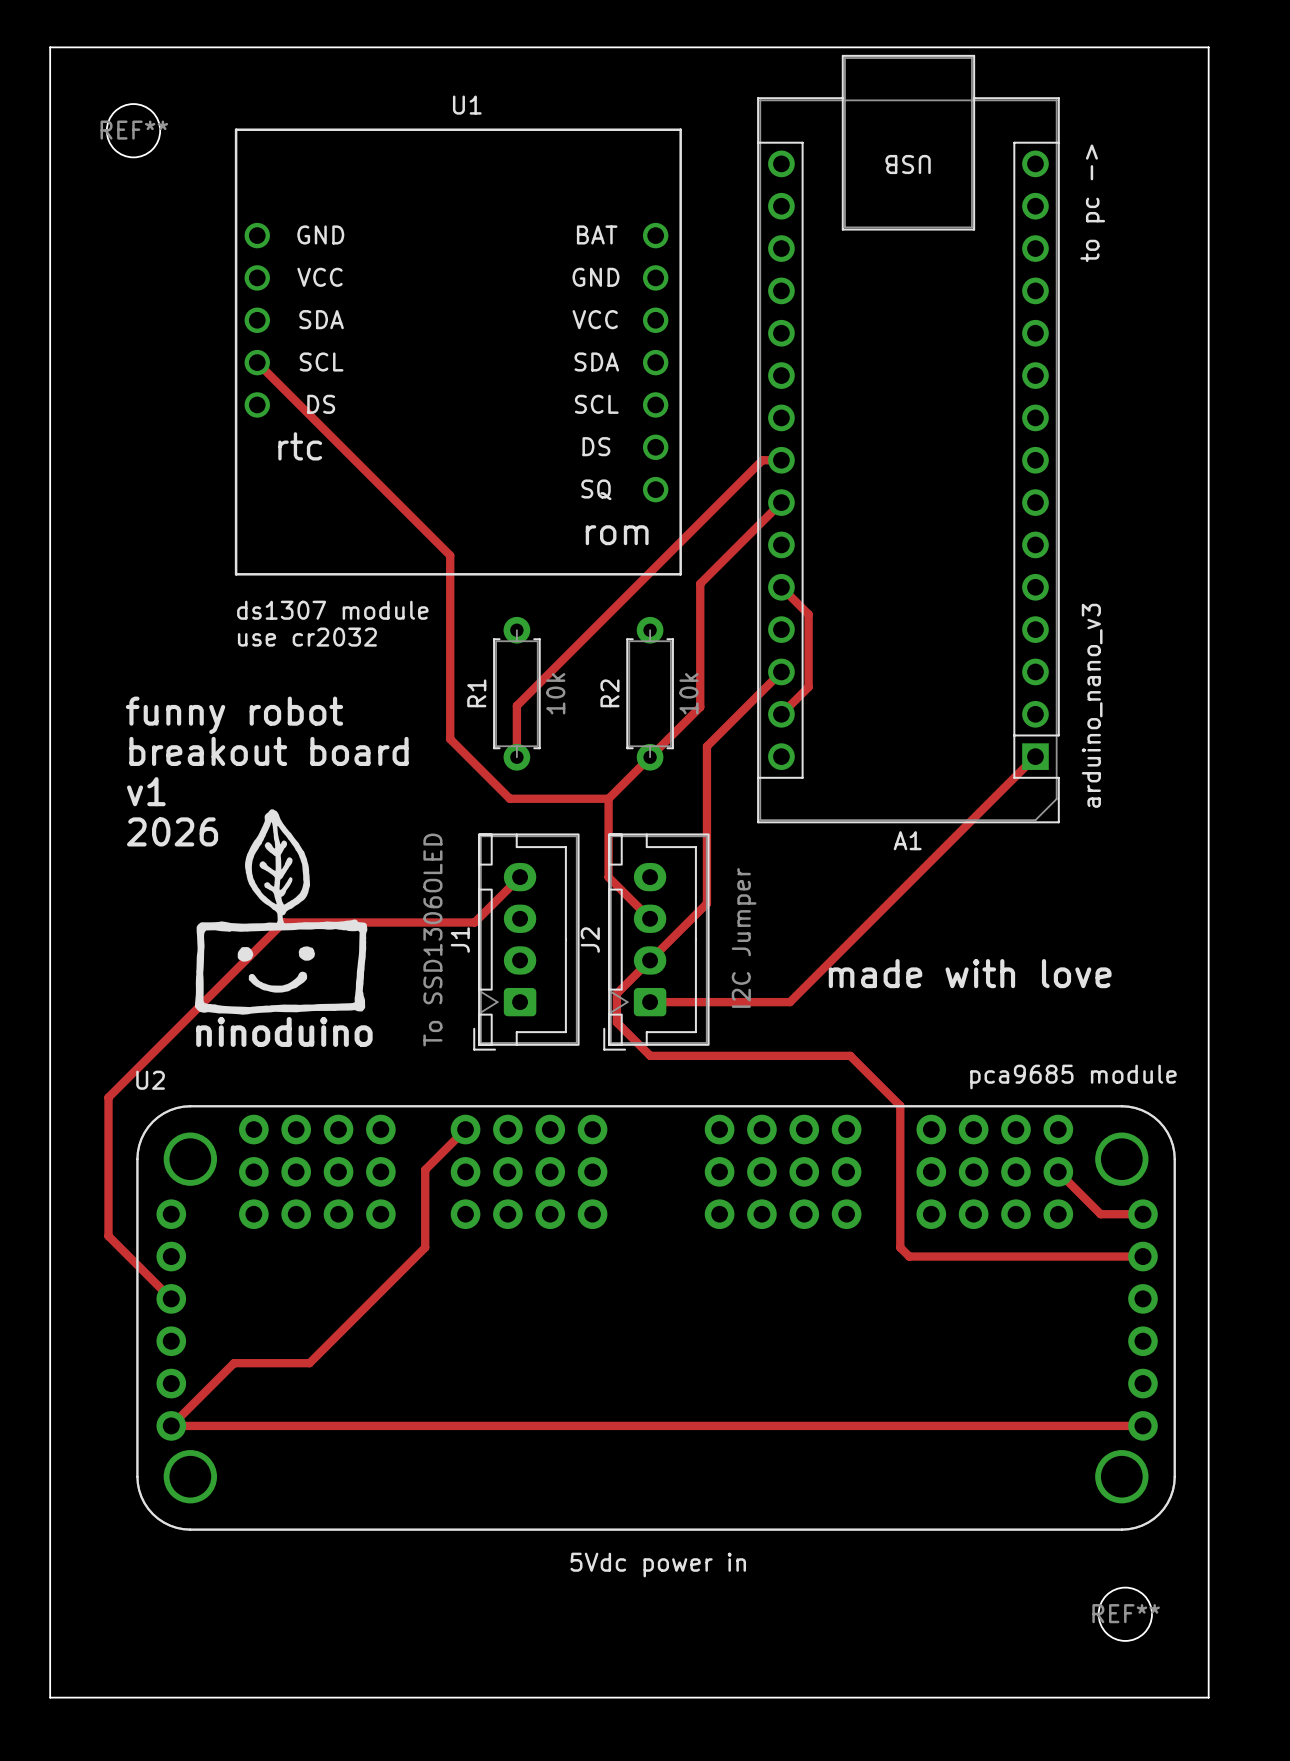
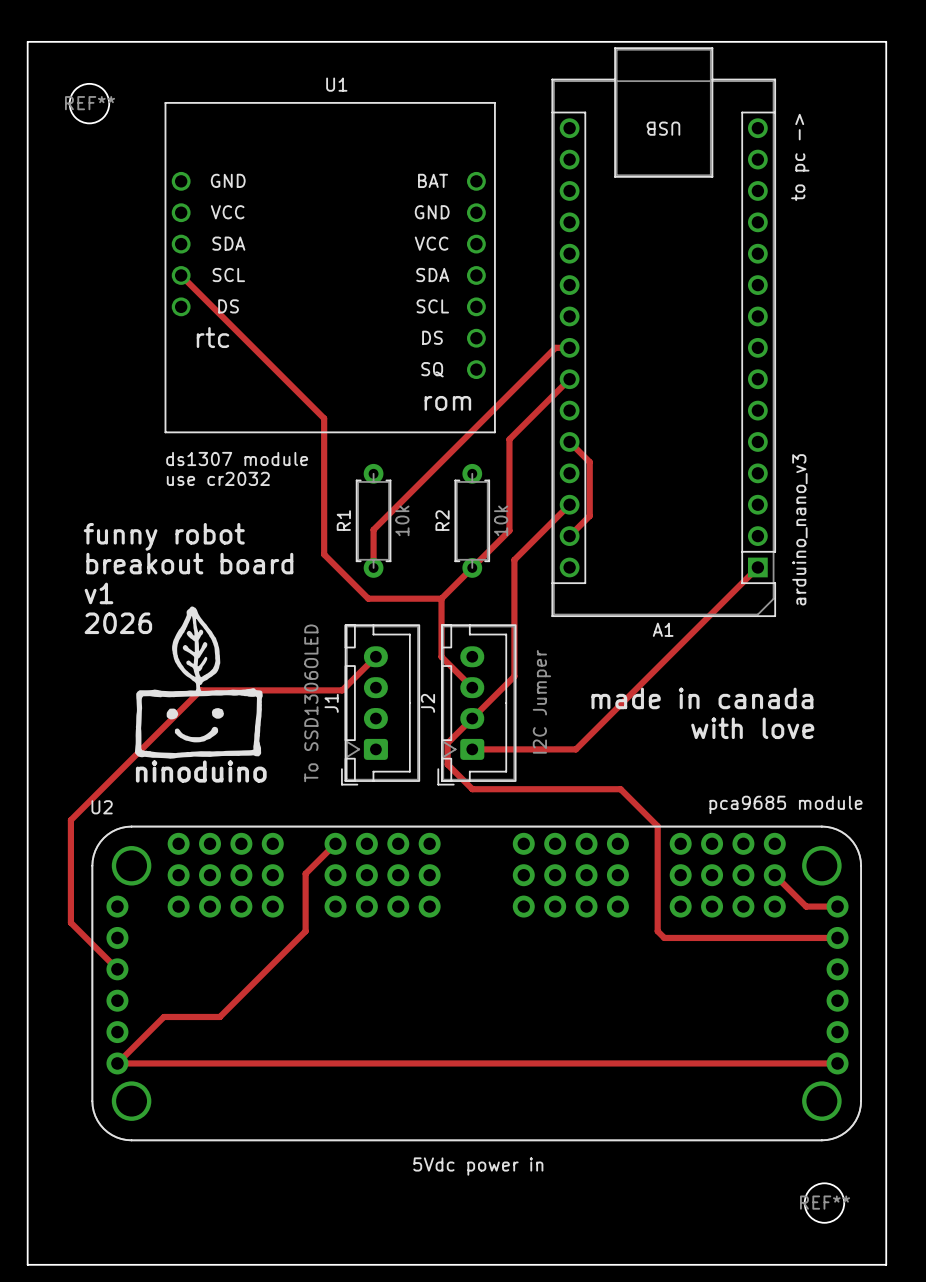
text: none -> made in canada (702, 698)
text: made with love (970, 973) -> with love (752, 728)

